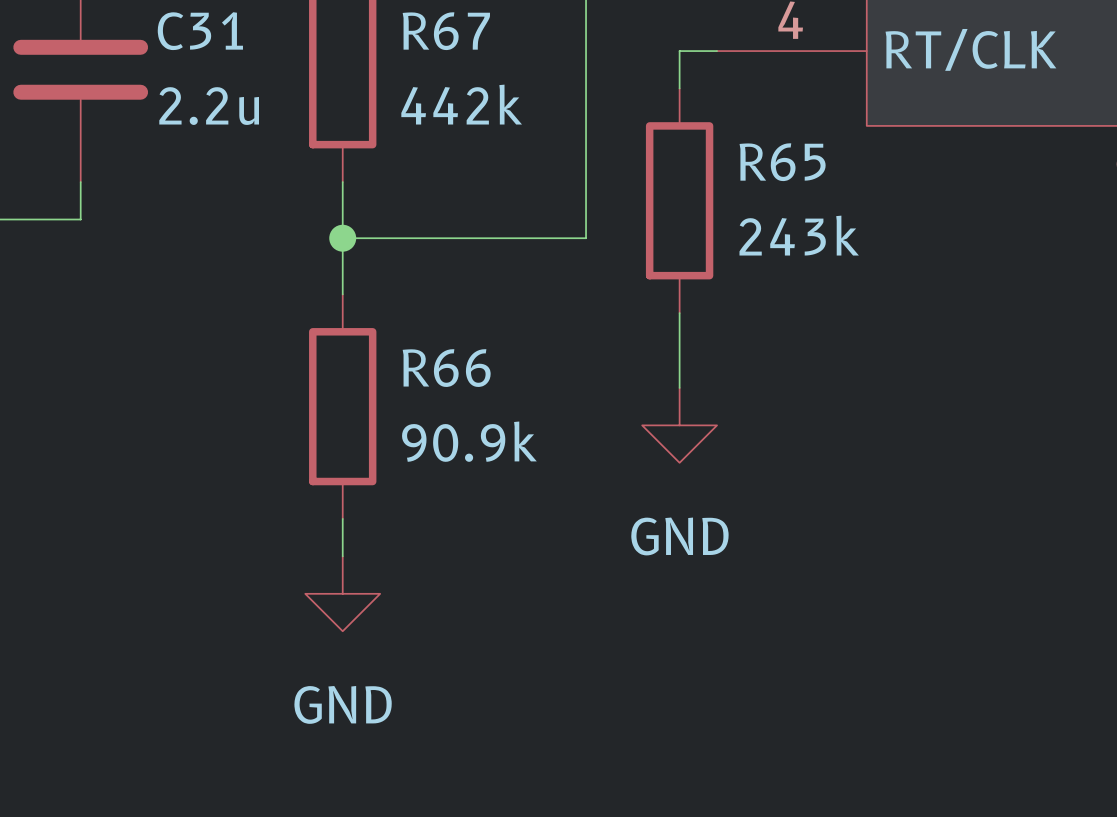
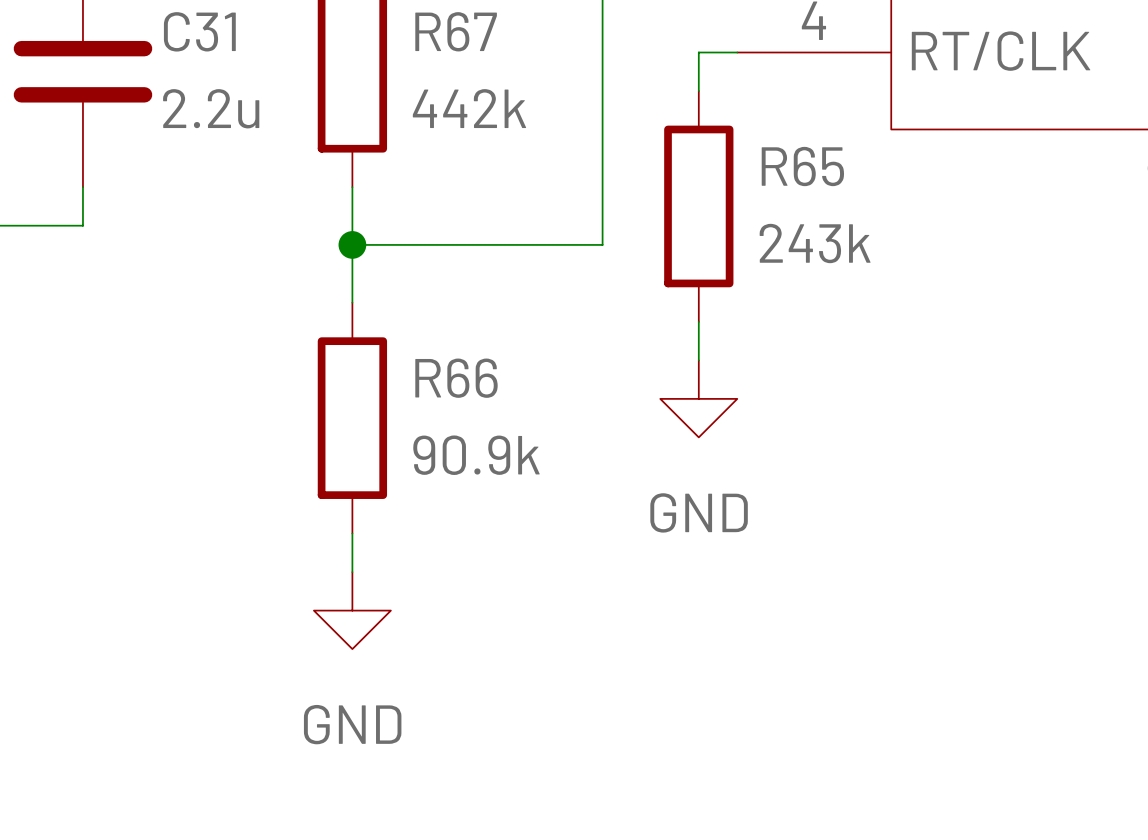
power symbol position: GND (679, 425) -> GND (698, 398)

